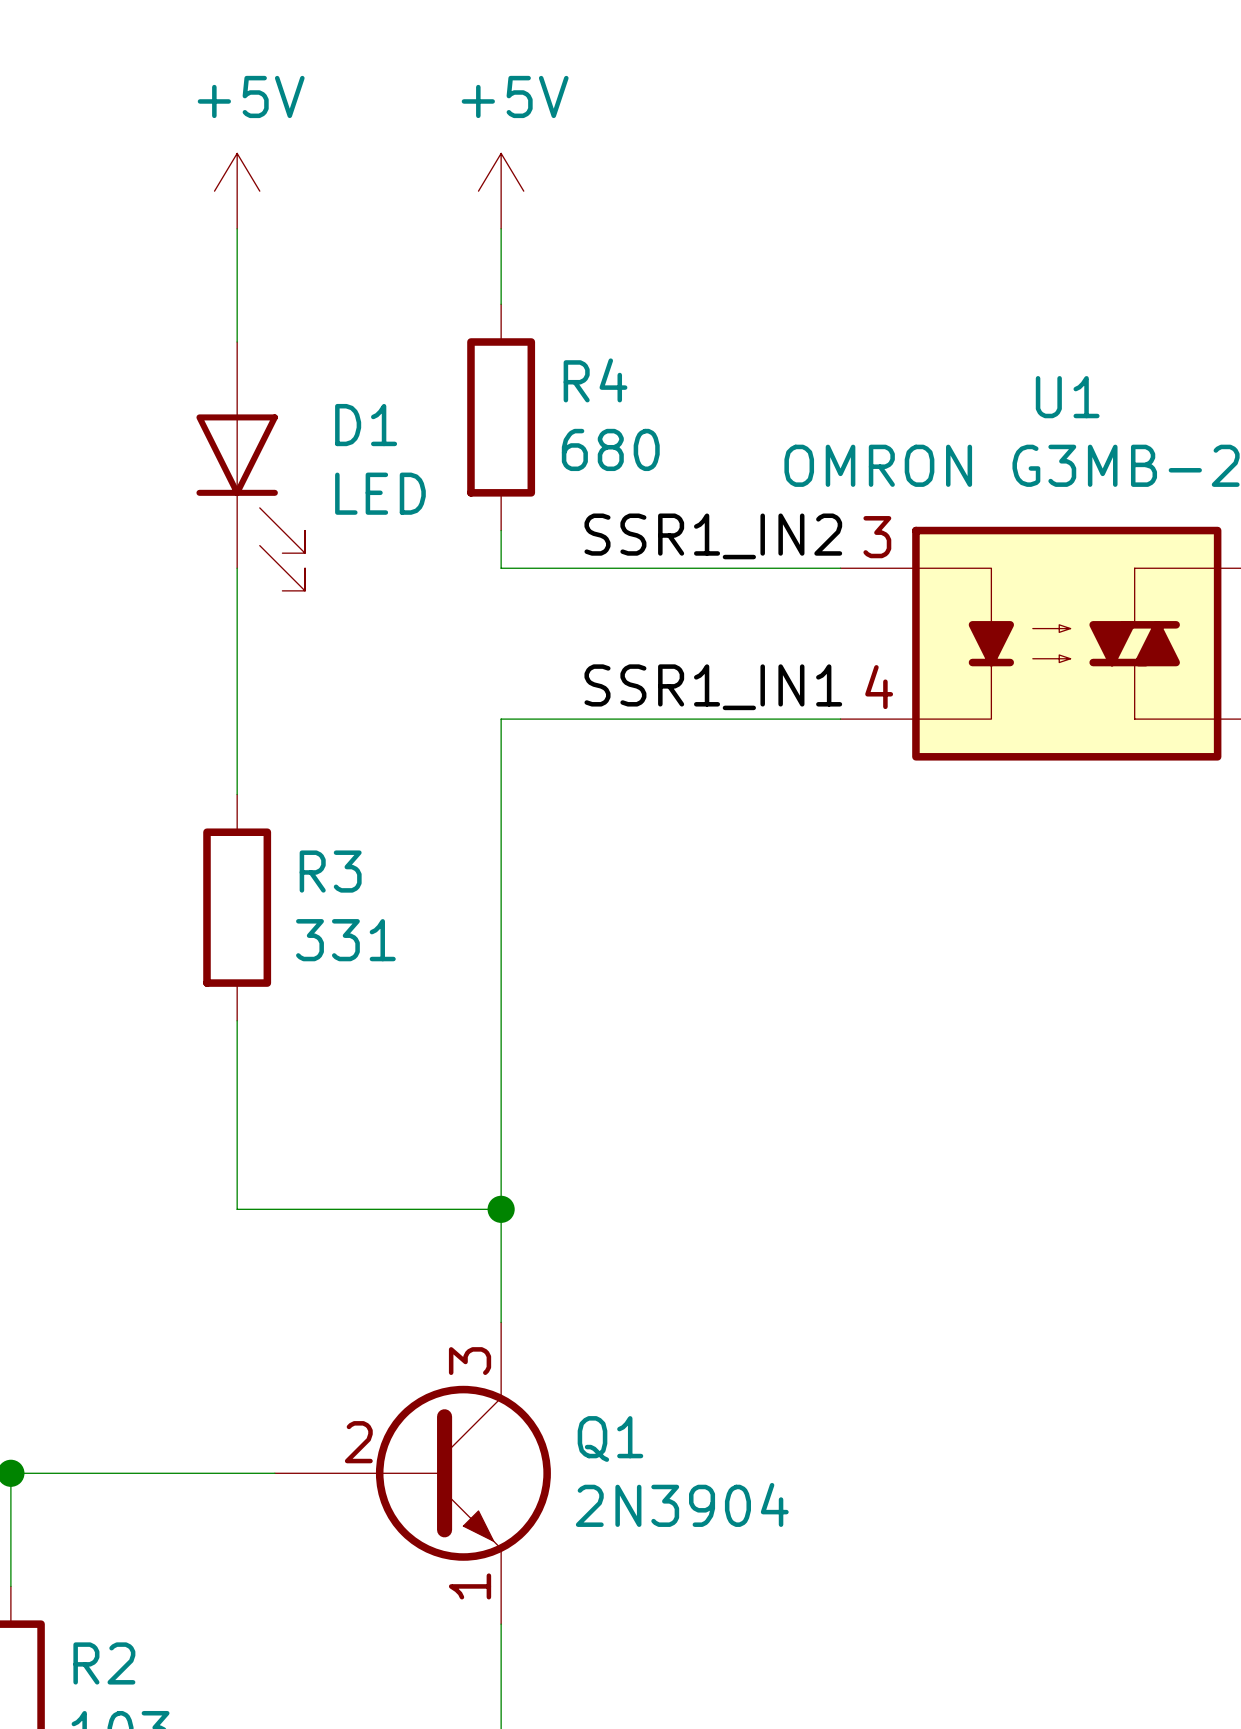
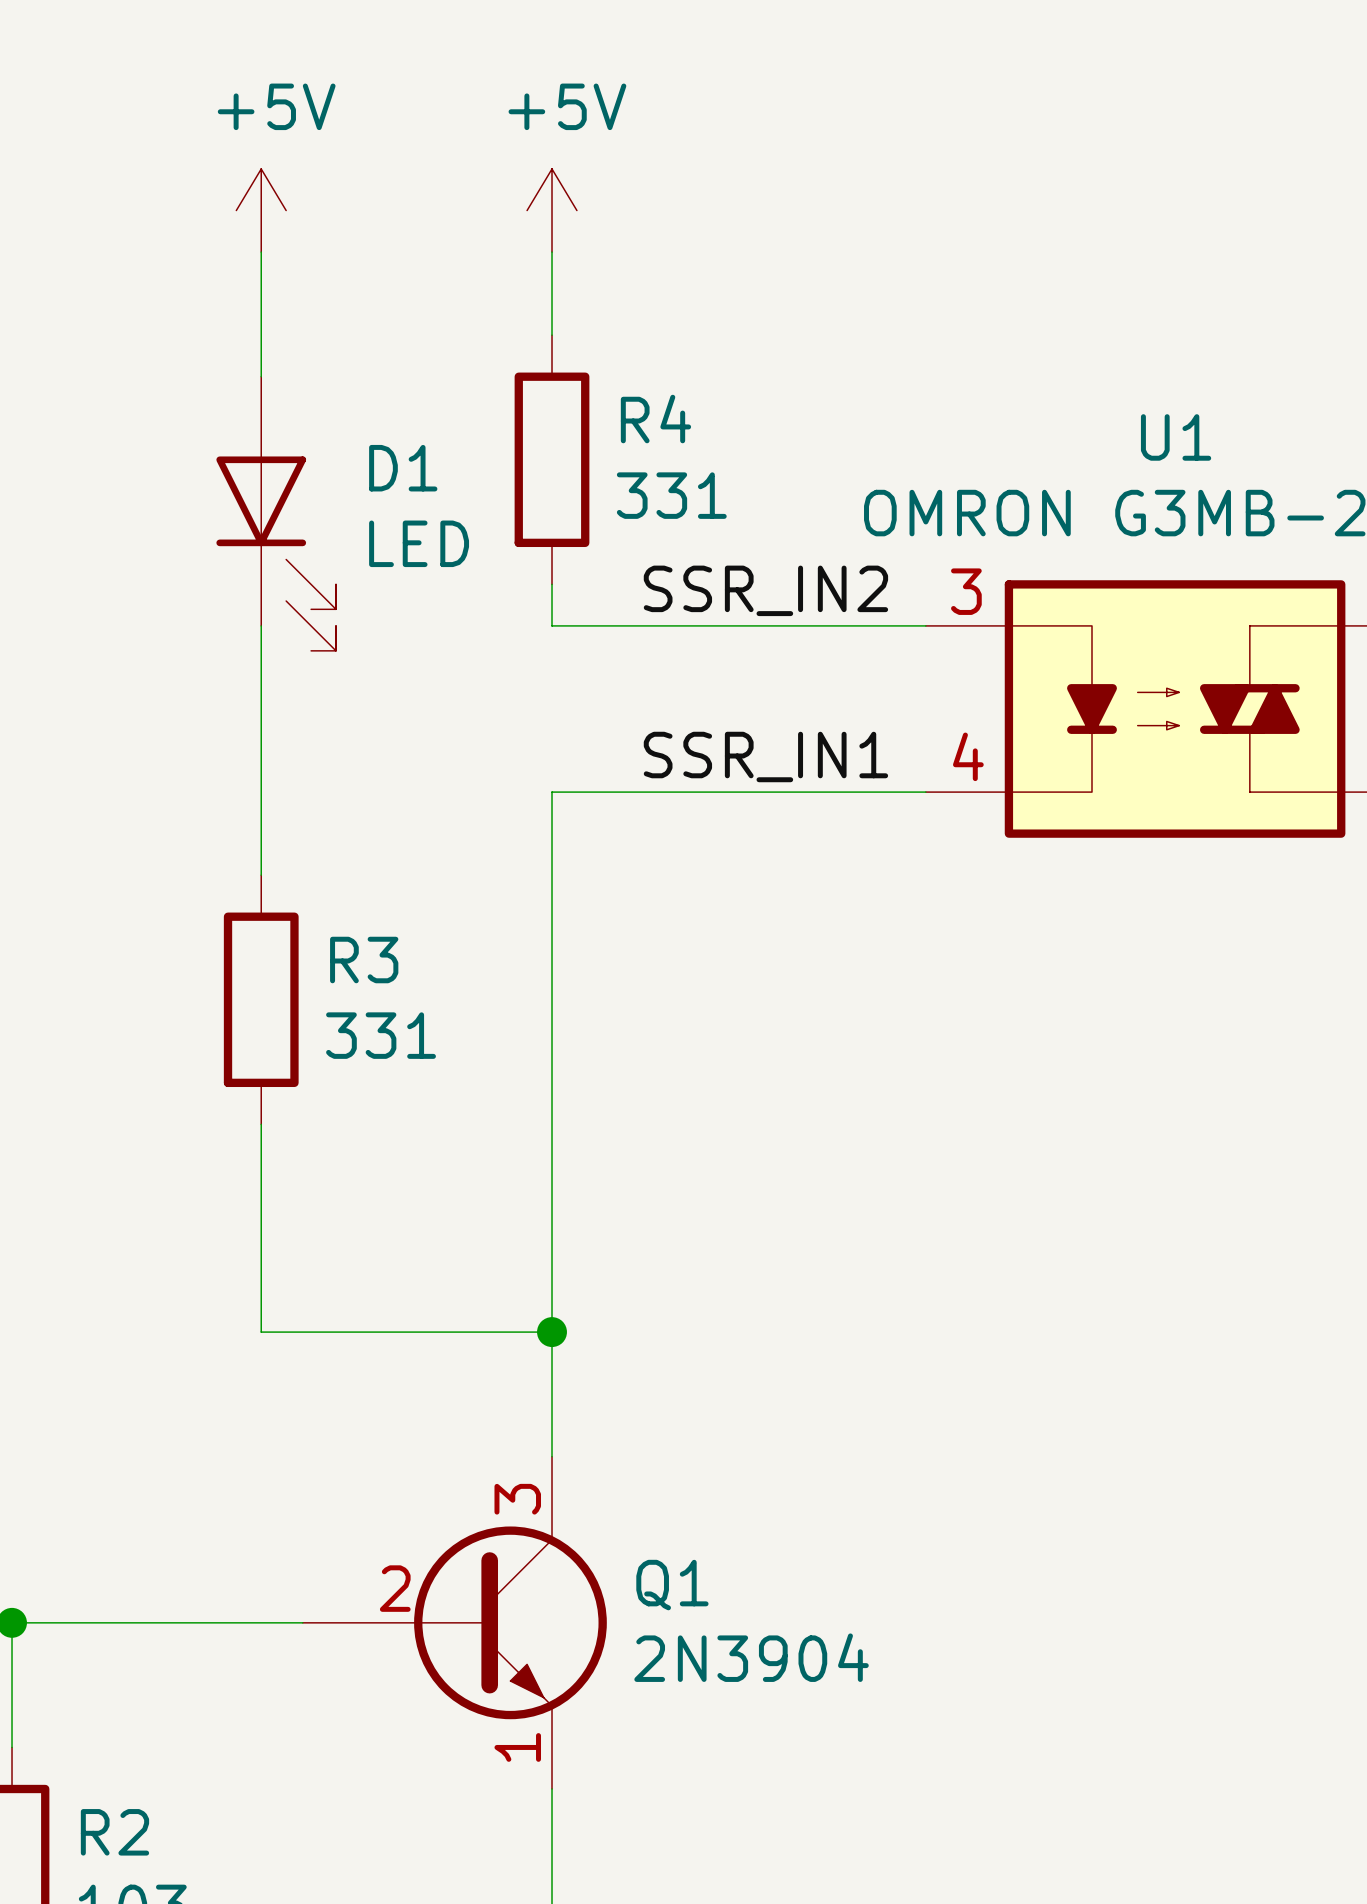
R4 value: 680 (610, 449) -> 331 (671, 495)
label: SSR1_IN2 (713, 536) -> SSR_IN2 (765, 590)
label: SSR1_IN1 (713, 687) -> SSR_IN1 (765, 757)

